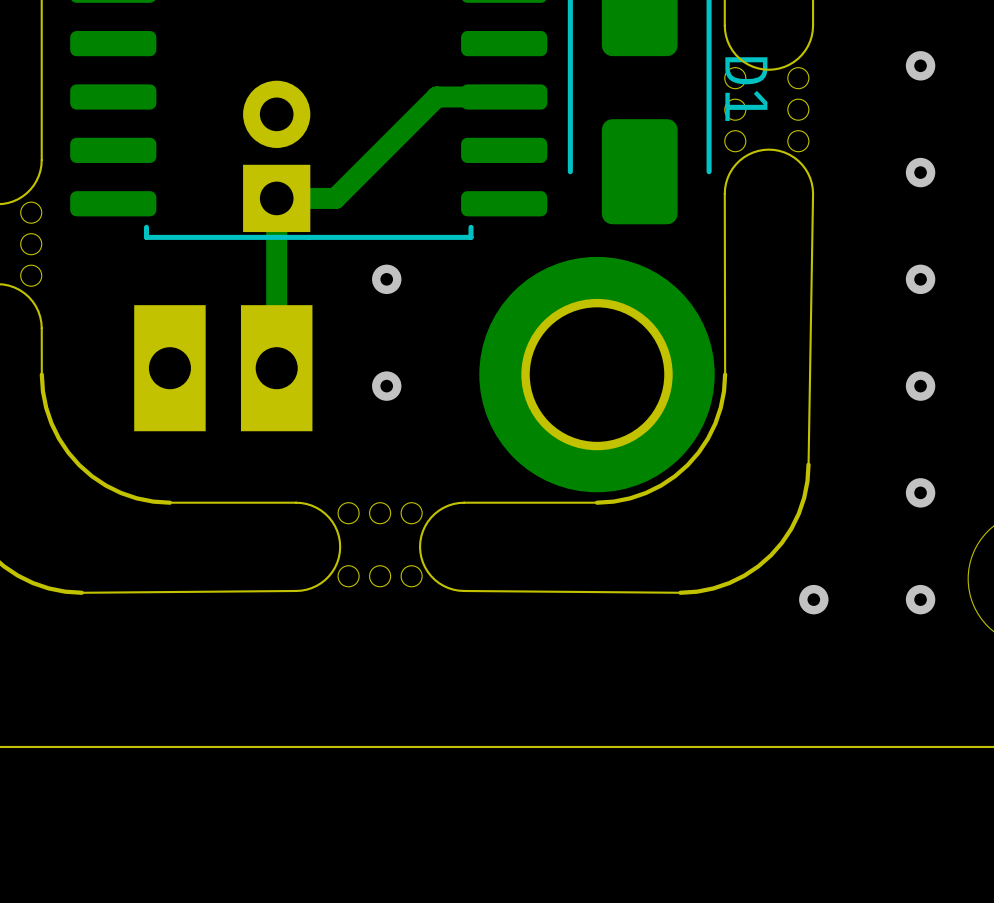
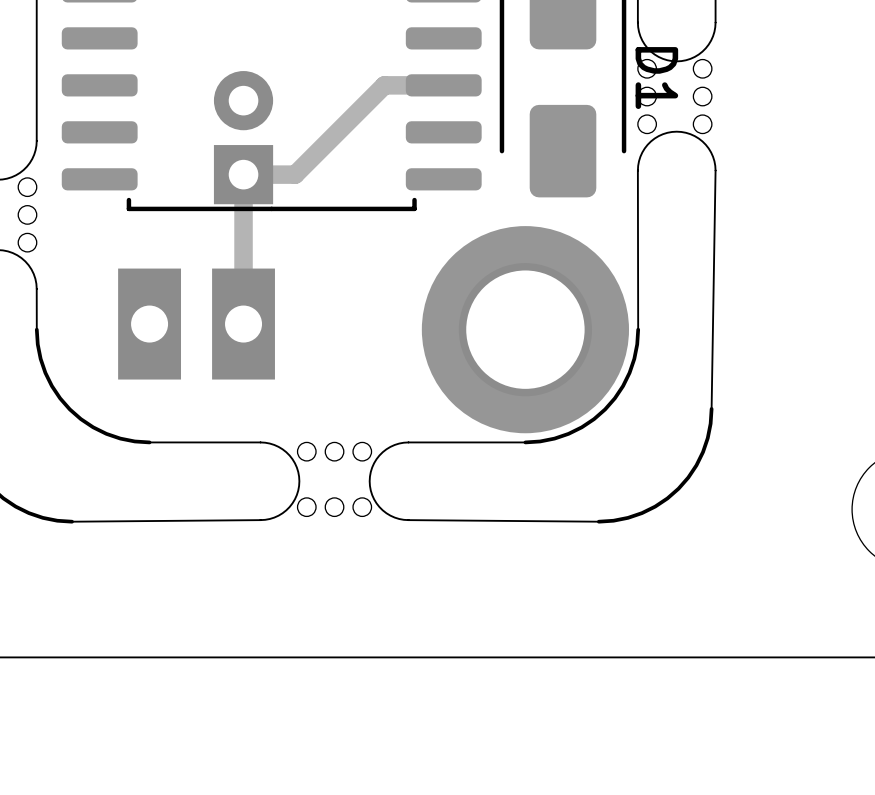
via: (920, 65) -> none
via: (920, 172) -> none
via: (386, 279) -> none
via: (920, 279) -> none
via: (386, 386) -> none
via: (920, 386) -> none
via: (920, 492) -> none
via: (813, 599) -> none
via: (920, 599) -> none

